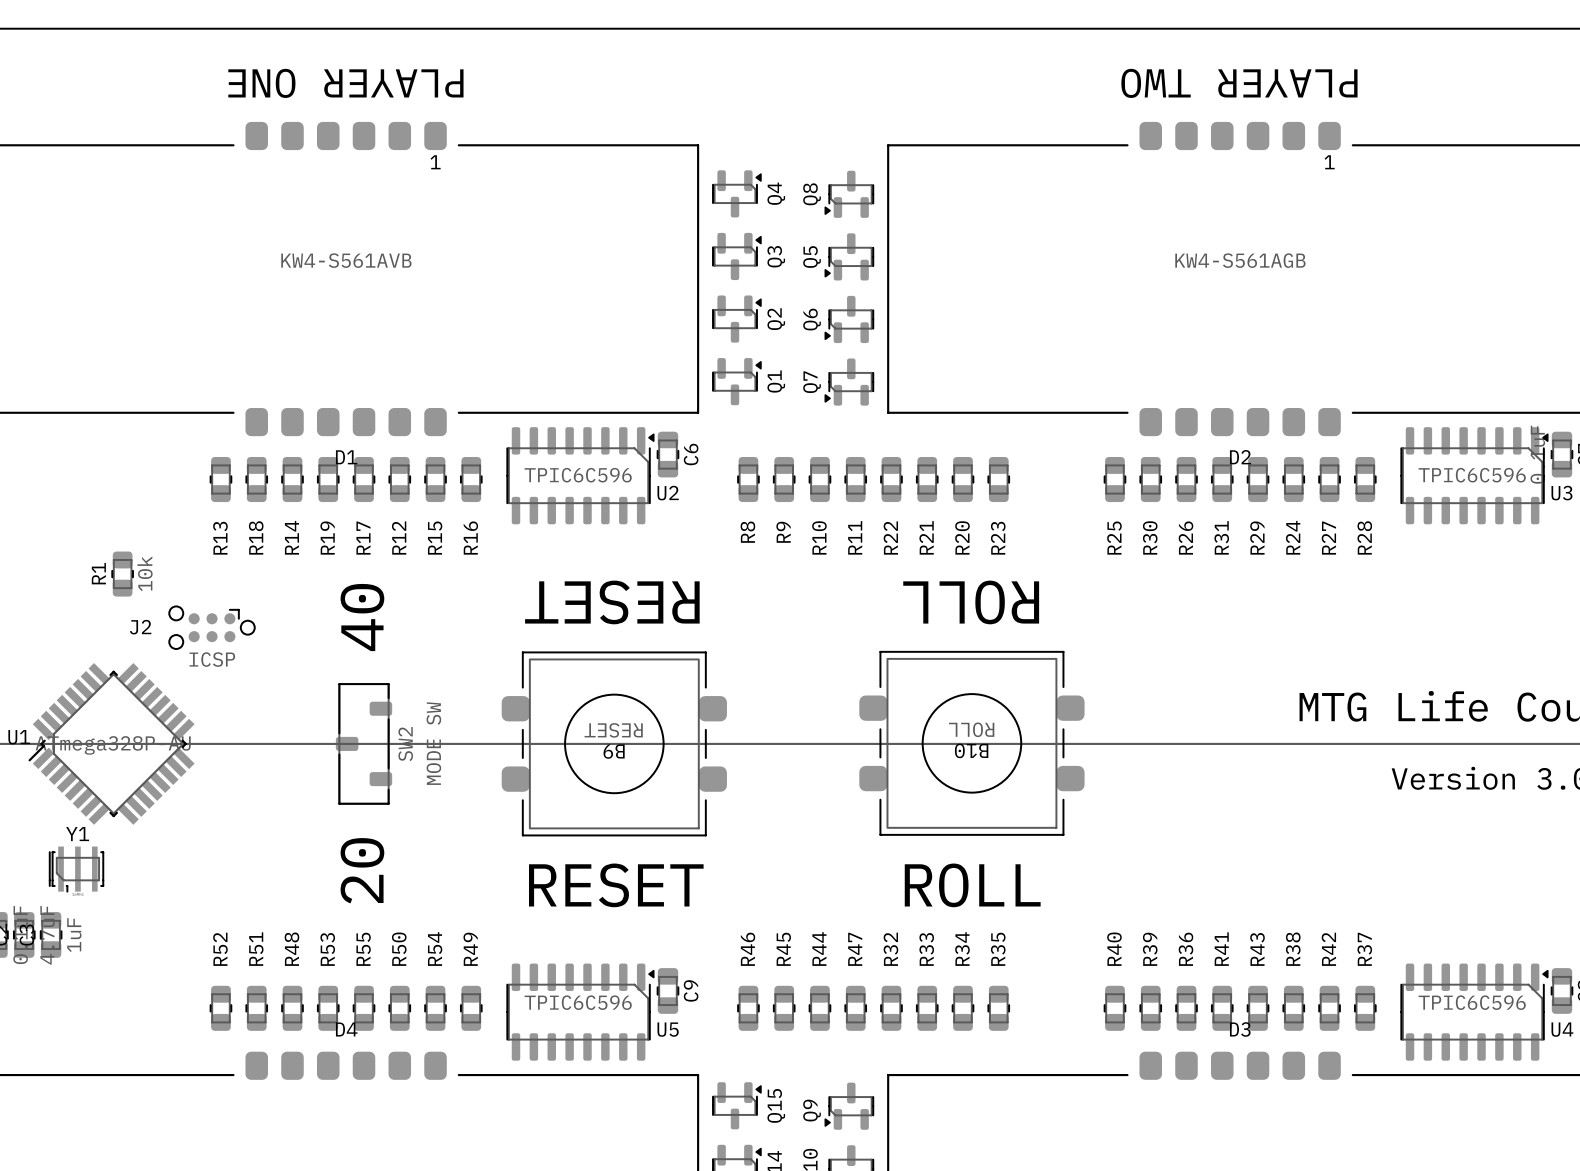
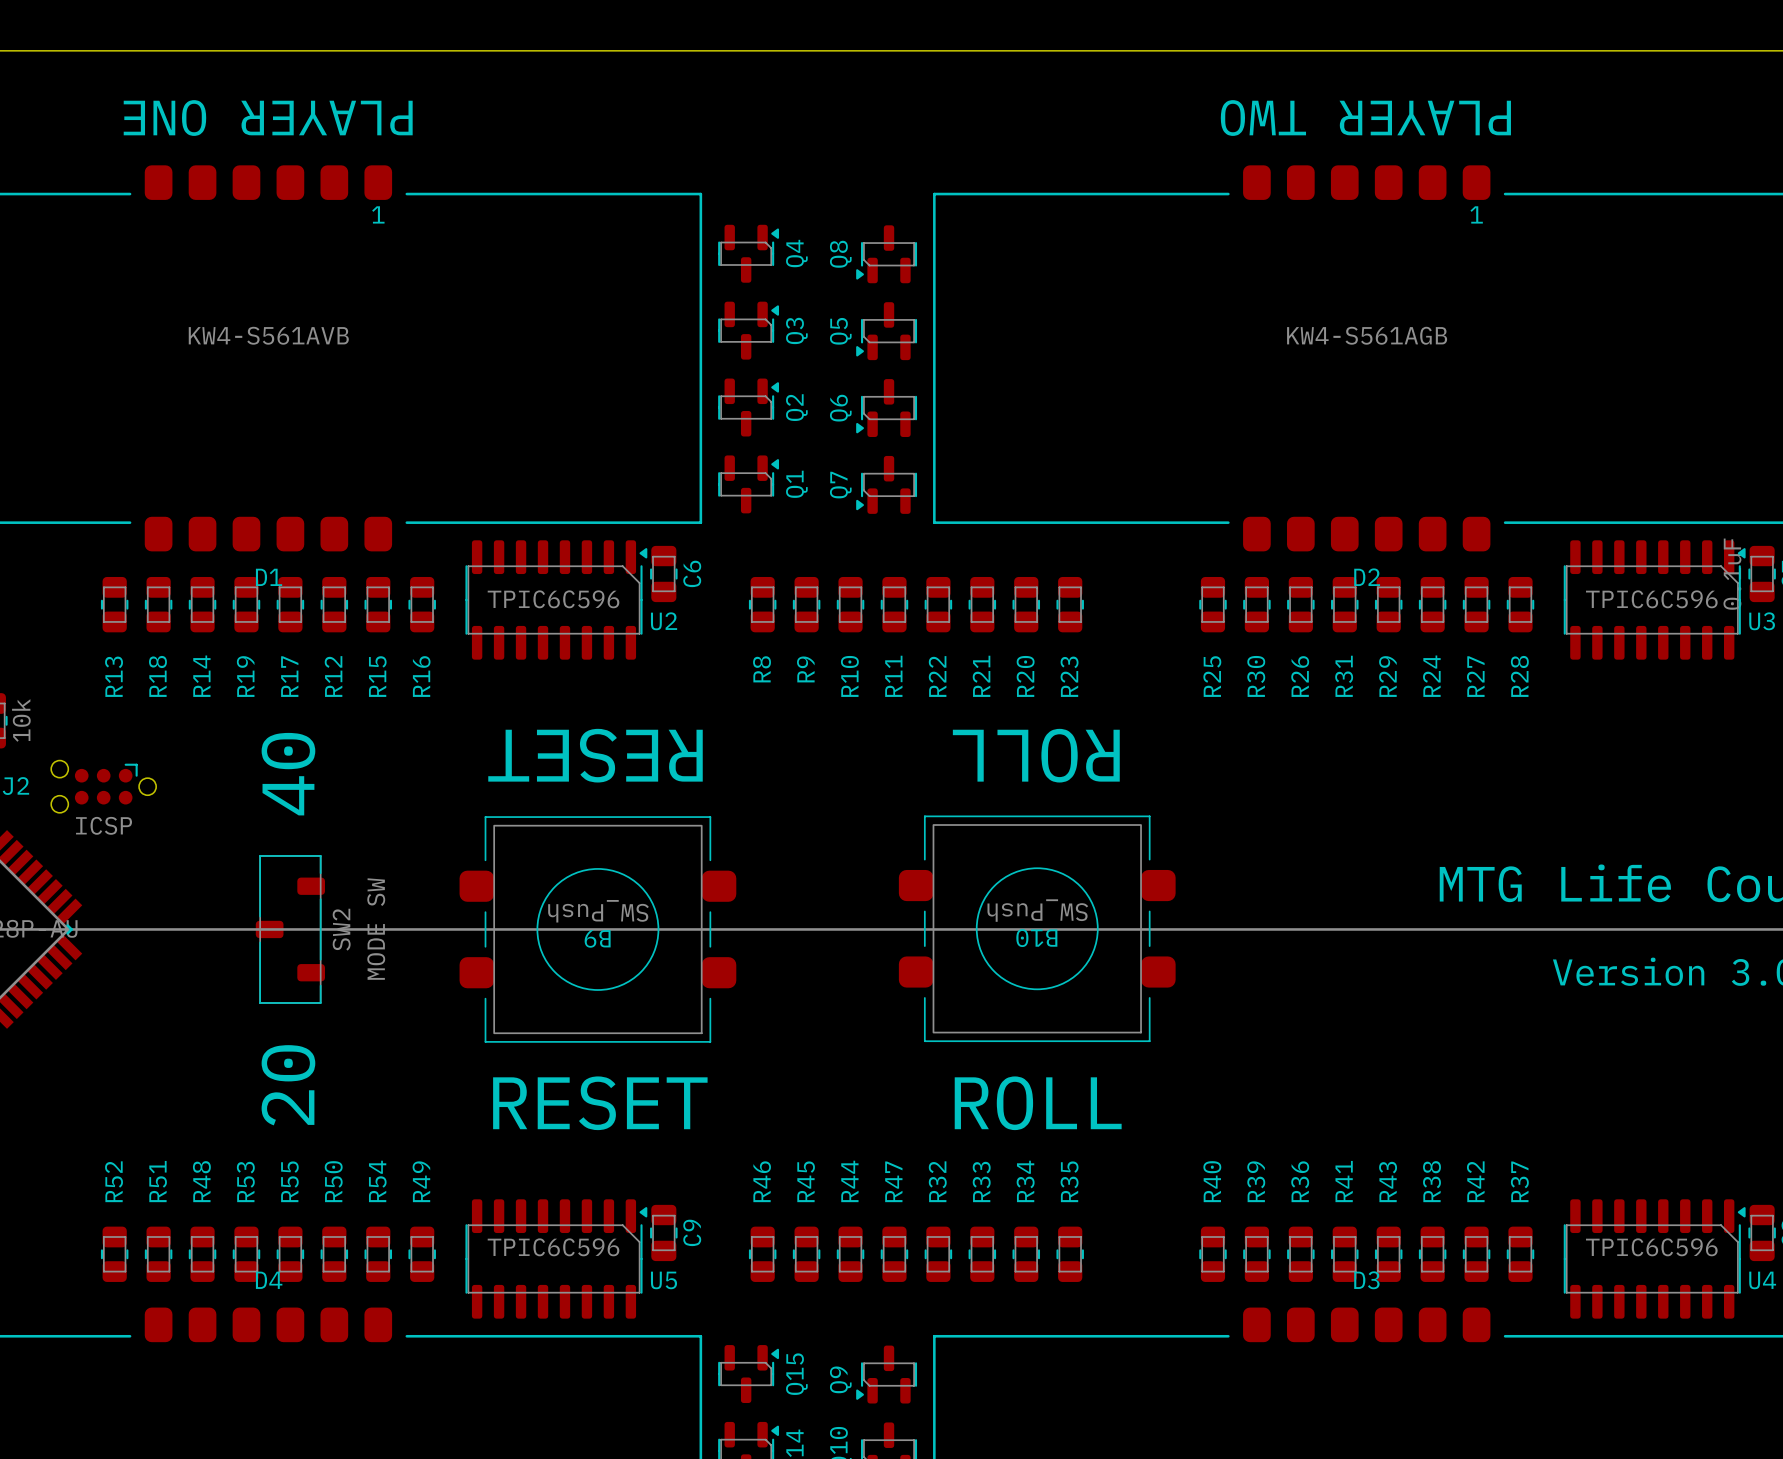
B10 value: ROLL (971, 729) -> SW_Push (1037, 910)
B9 value: RESET (613, 730) -> SW_Push (598, 911)

